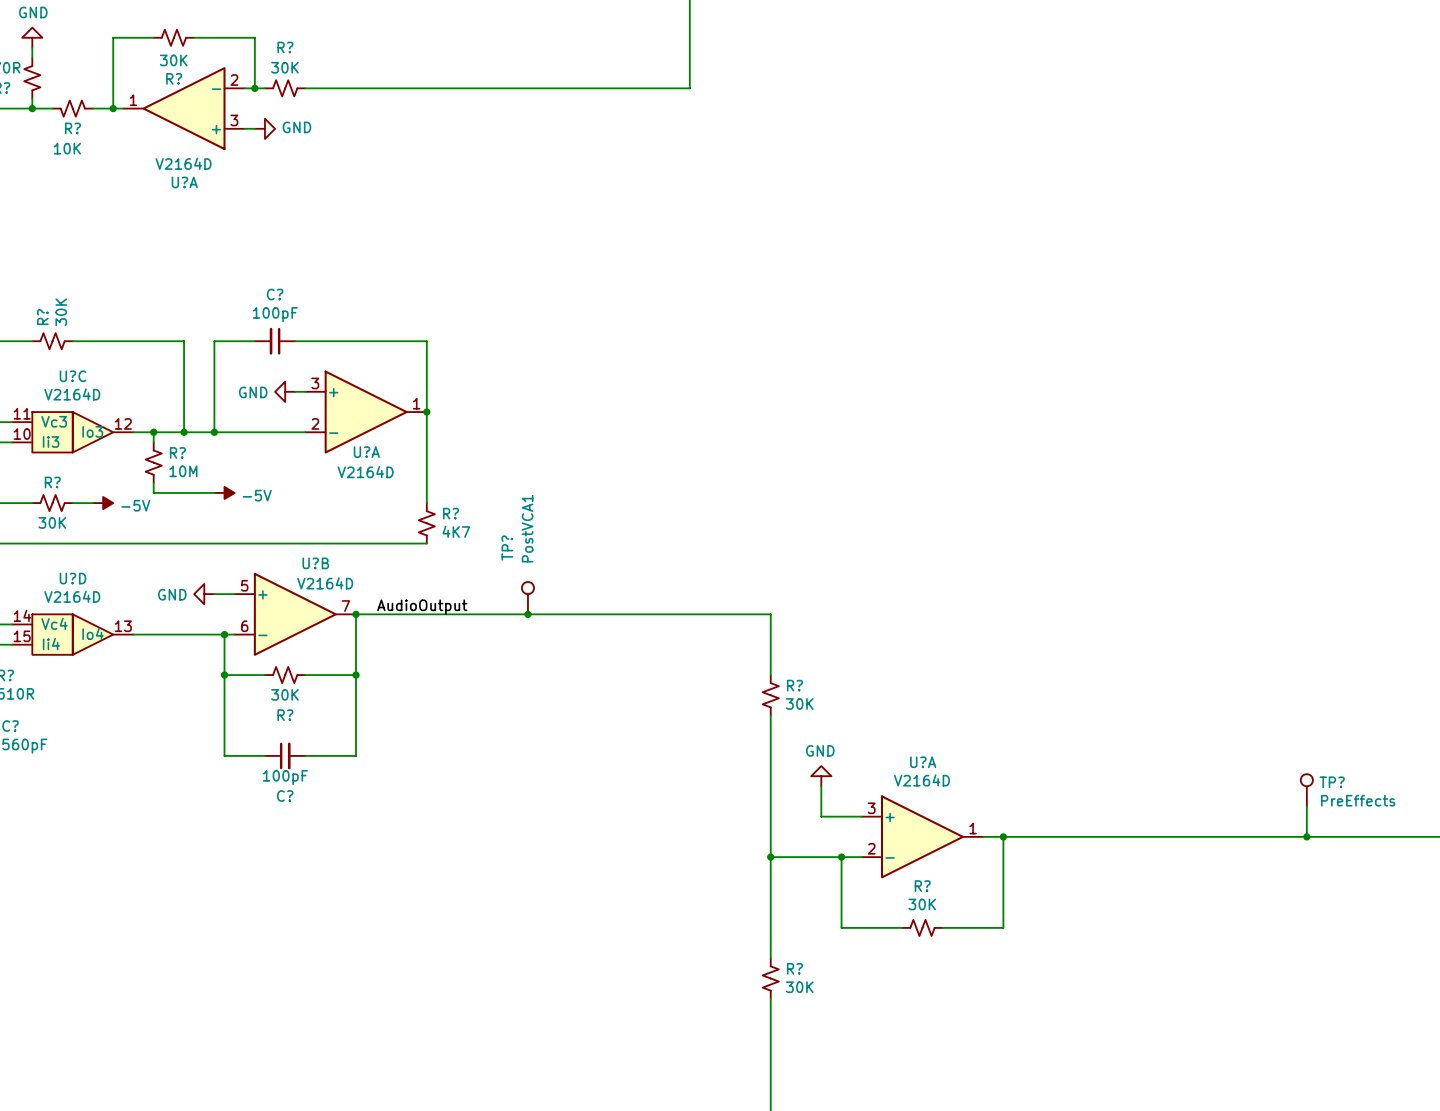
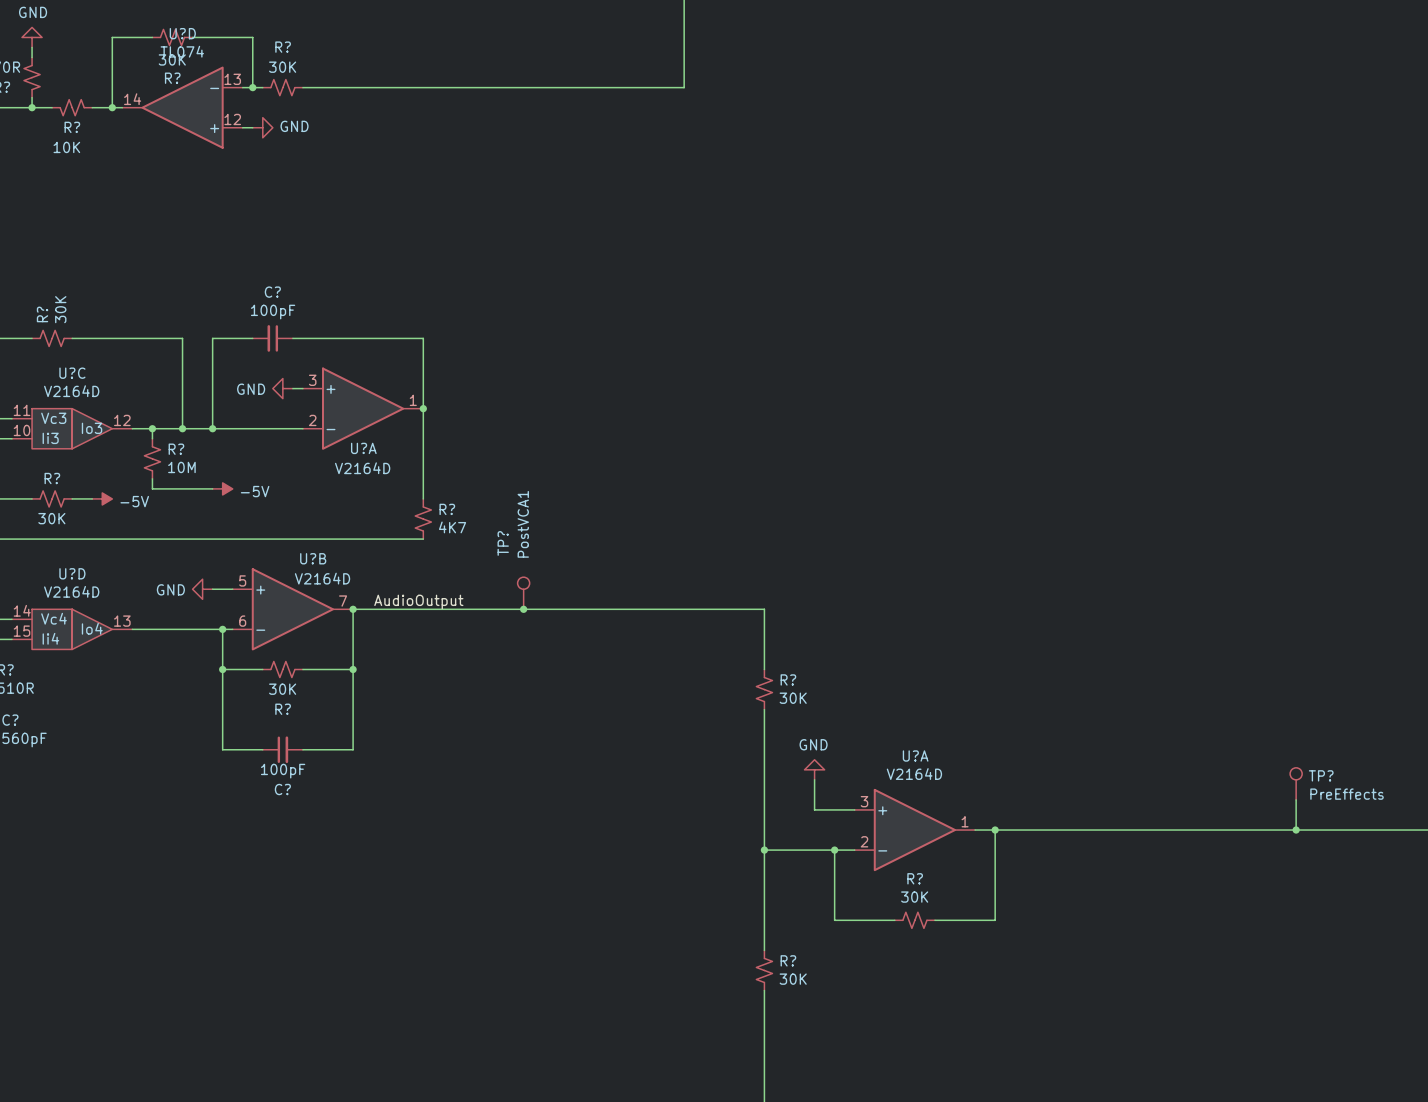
U?A pin number: 2 (234, 80) -> 13 (232, 79)
U?A pin number: 1 (133, 100) -> 14 (132, 99)
U?A pin number: 3 (234, 120) -> 12 (232, 119)
U?A value: V2164D (183, 163) -> TL074 (182, 51)
U?A name: U?A (184, 182) -> U?D (182, 33)

